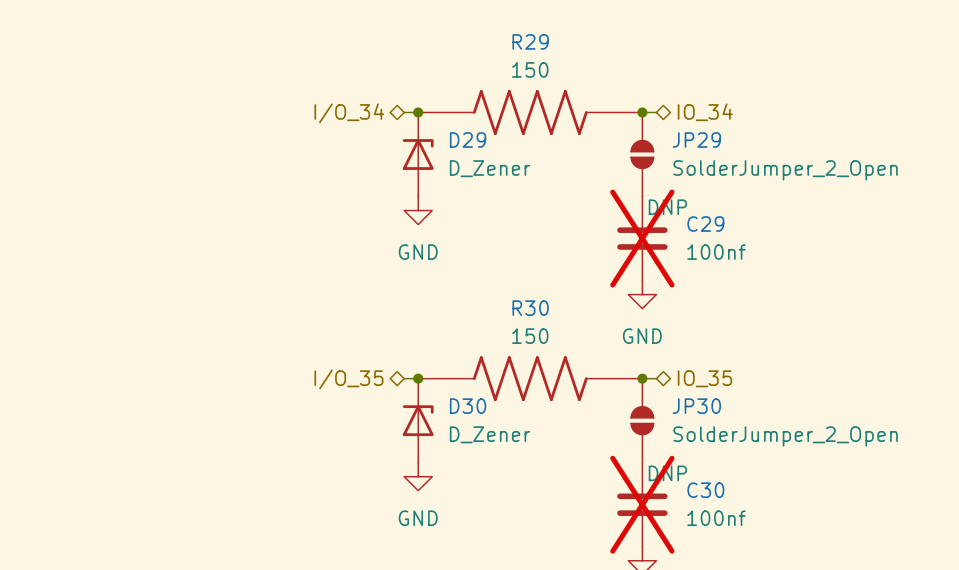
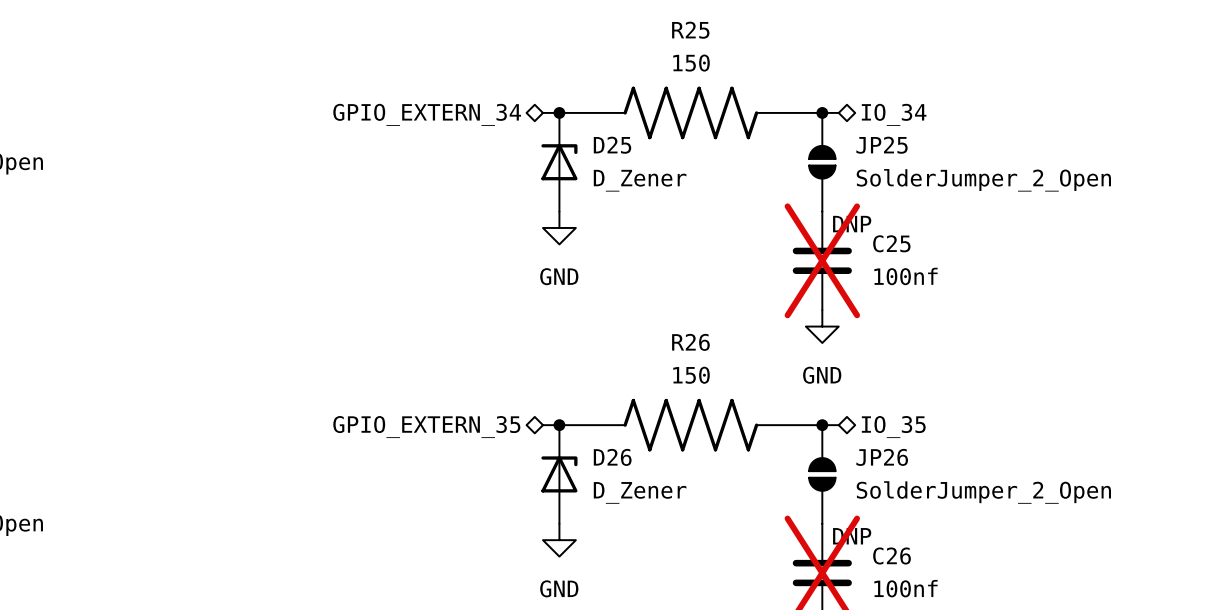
R29 name: R29 (530, 41) -> R25 (690, 30)
hierarchical label: I/O_34 (349, 113) -> GPIO_EXTERN_34 (427, 114)
D29 name: D29 (468, 139) -> D25 (612, 145)
JP29 name: JP29 (696, 139) -> JP25 (882, 145)
C29 name: C29 (705, 224) -> C25 (891, 243)
R30 name: R30 (530, 308) -> R26 (690, 342)
hierarchical label: I/O_35 (348, 379) -> GPIO_EXTERN_35 (426, 427)
D30 name: D30 (468, 406) -> D26 (612, 457)
JP30 name: JP30 (696, 406) -> JP26 (882, 457)
C30 name: C30 (705, 490) -> C26 (892, 555)

